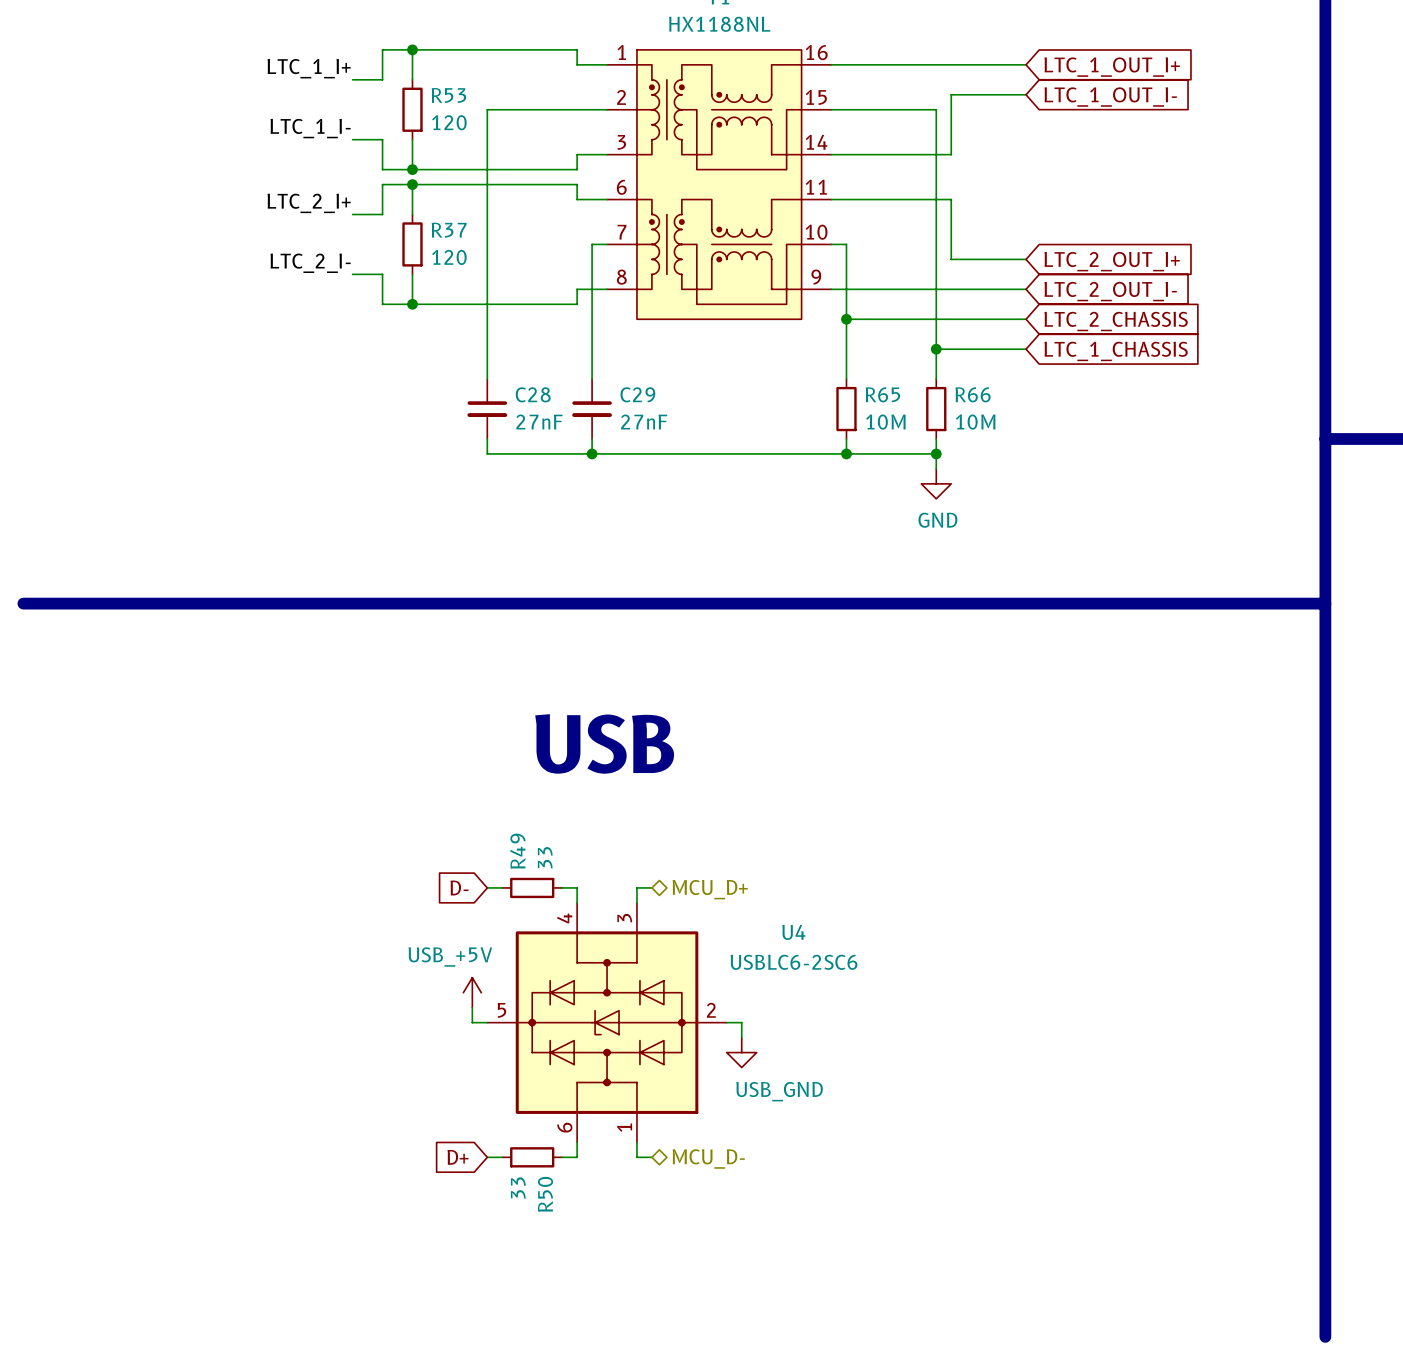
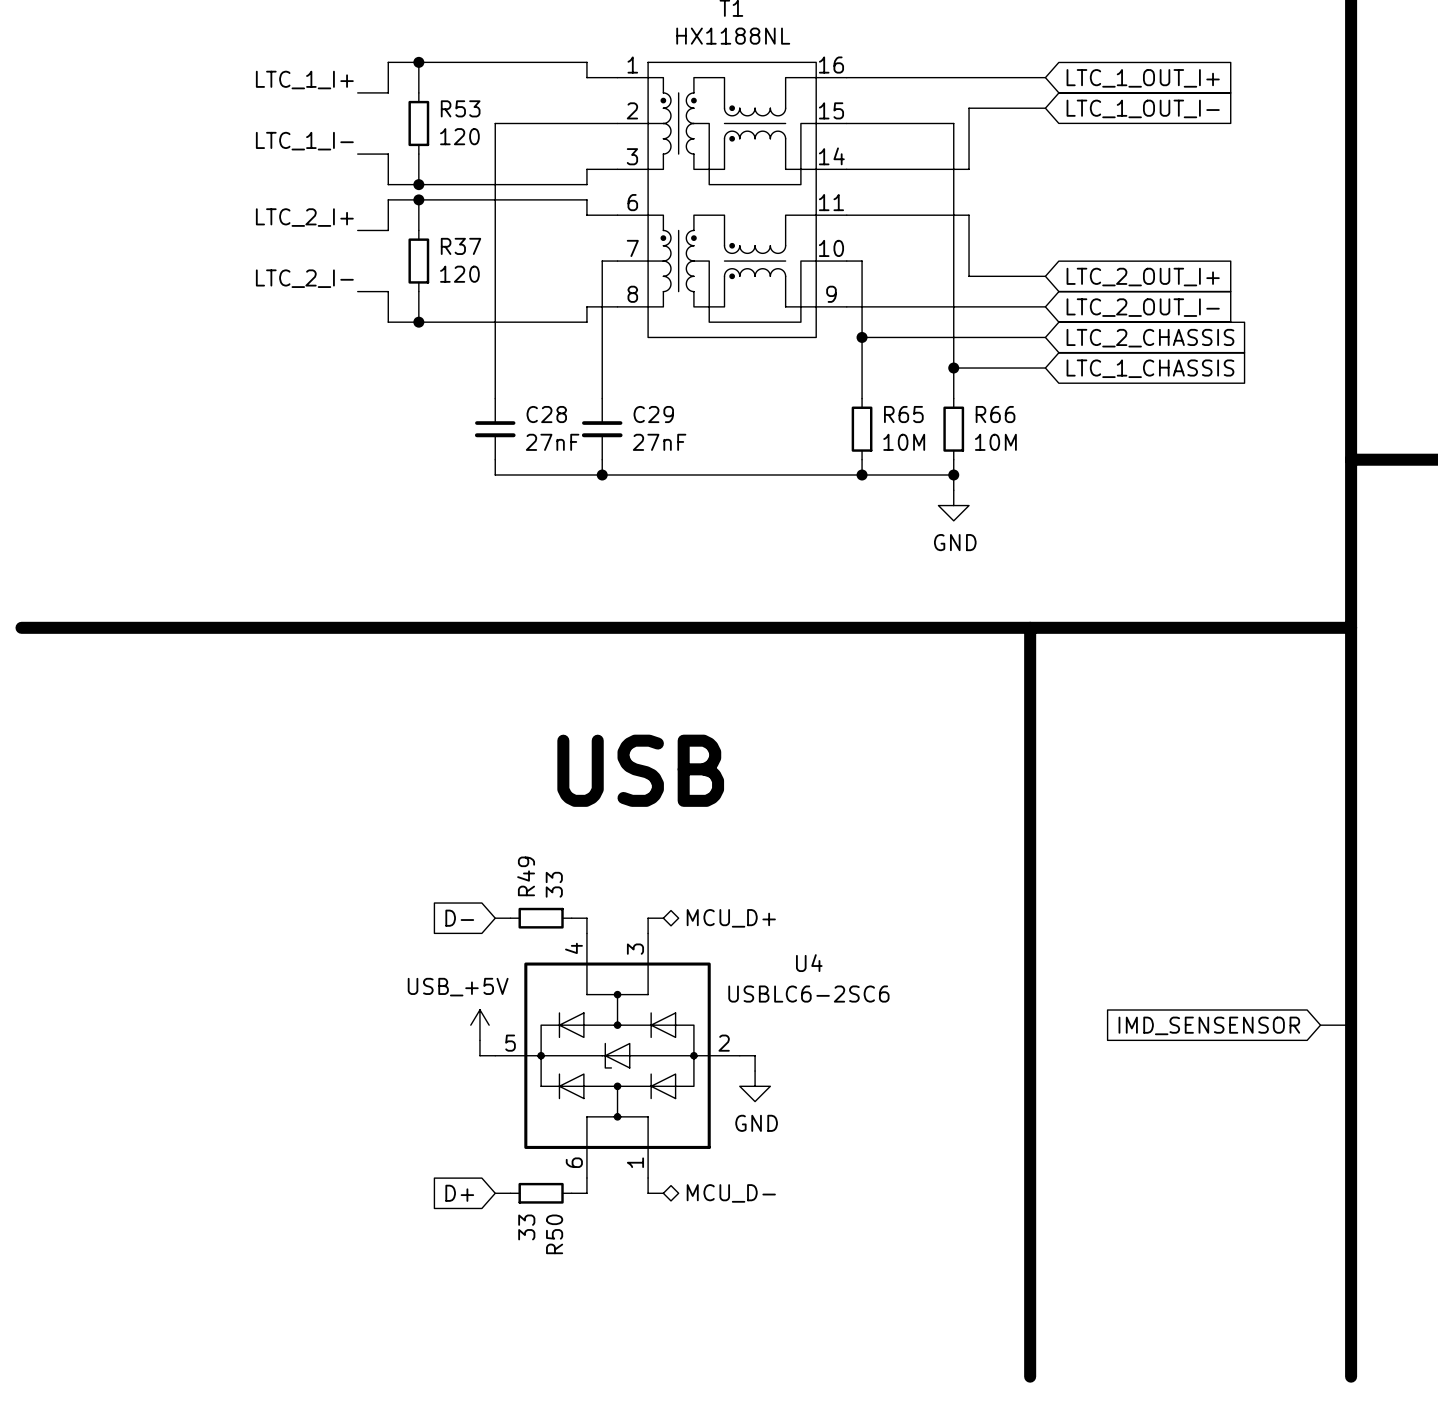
line: none -> (1030, 627) (1030, 1376)
wire: none -> (1320, 1025) (1351, 1025)
global label: none -> IMD_SENSENSOR (1209, 1025)
power symbol: USB_GND (741, 1052) -> GND (755, 1086)

